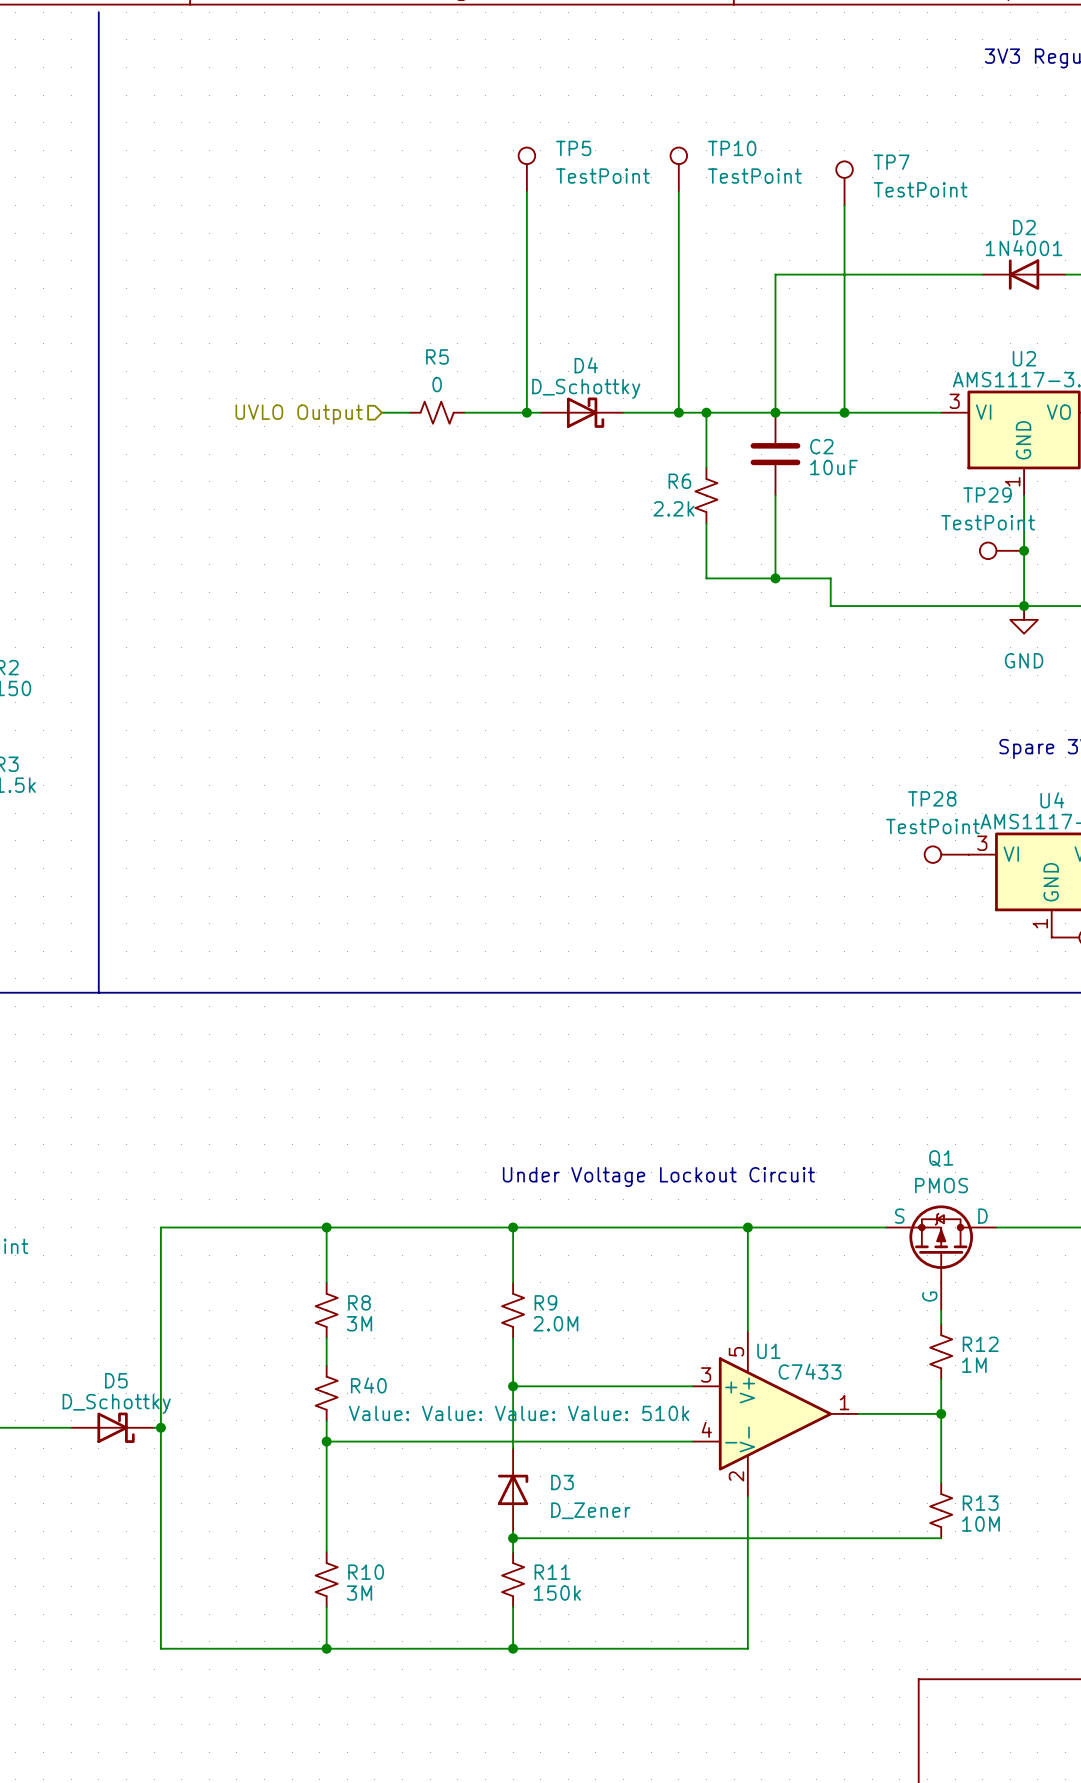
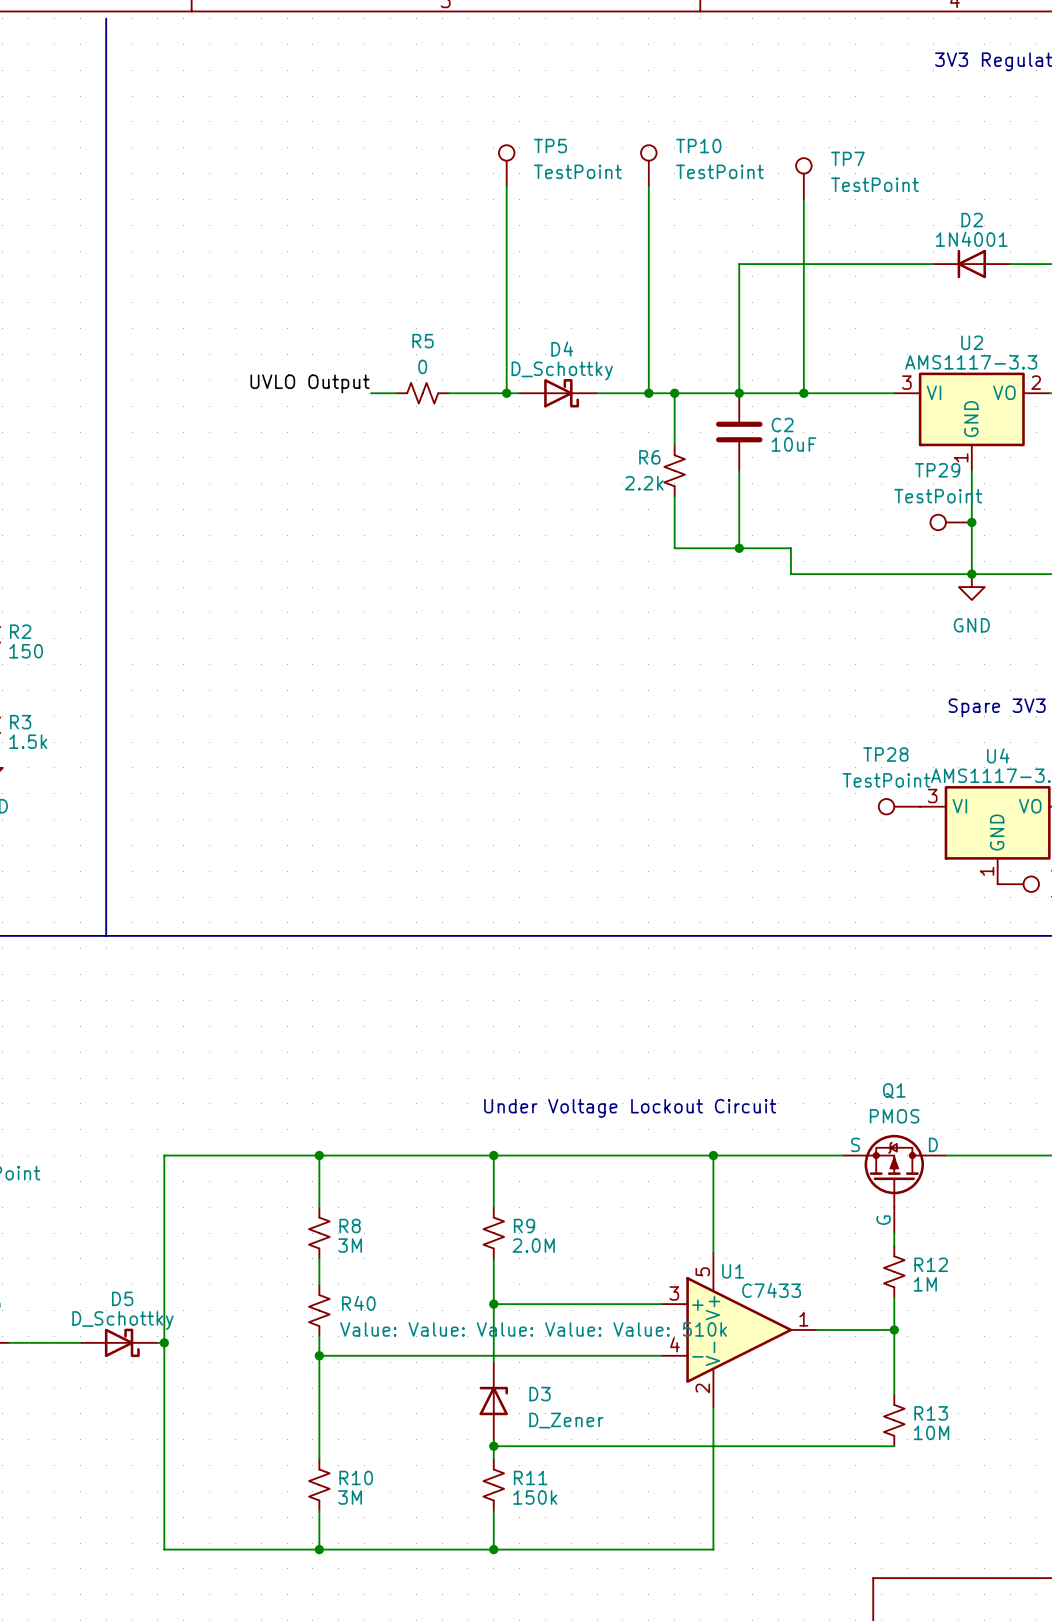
label: none -> UVLO Output (310, 383)
hierarchical label: UVLO Output (299, 414) -> none
R40 value: Value: Value: Value: Value: 510k (519, 1413) -> Value: Value: Value: Value: Value: 510k (533, 1329)

